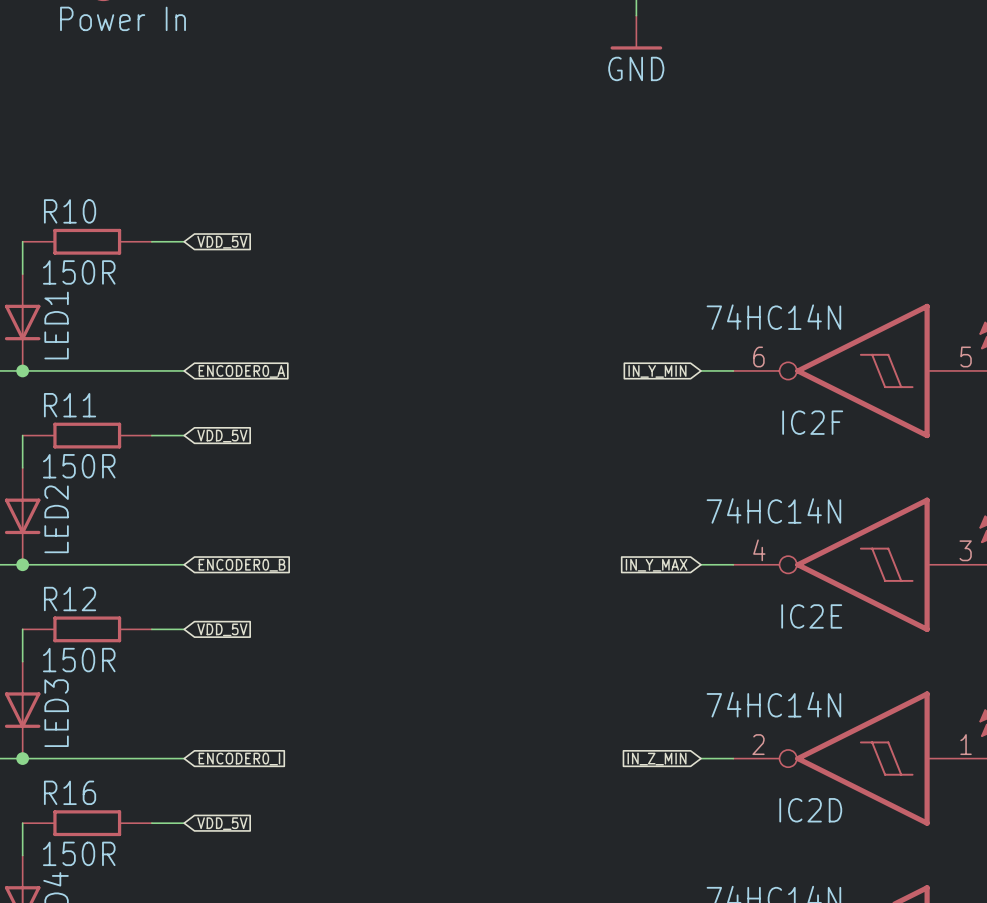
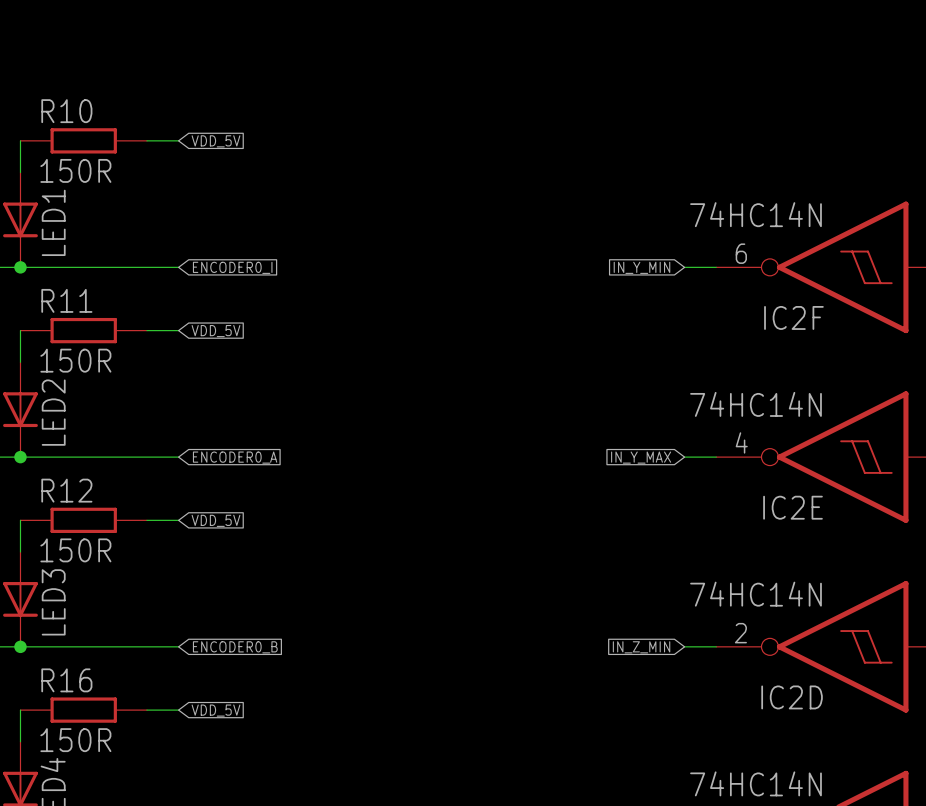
global label: ENCODER0_A (241, 371) -> ENCODER0_I (232, 267)
global label: ENCODER0_B (242, 565) -> ENCODER0_A (235, 457)
global label: ENCODER0_I (239, 759) -> ENCODER0_B (235, 647)

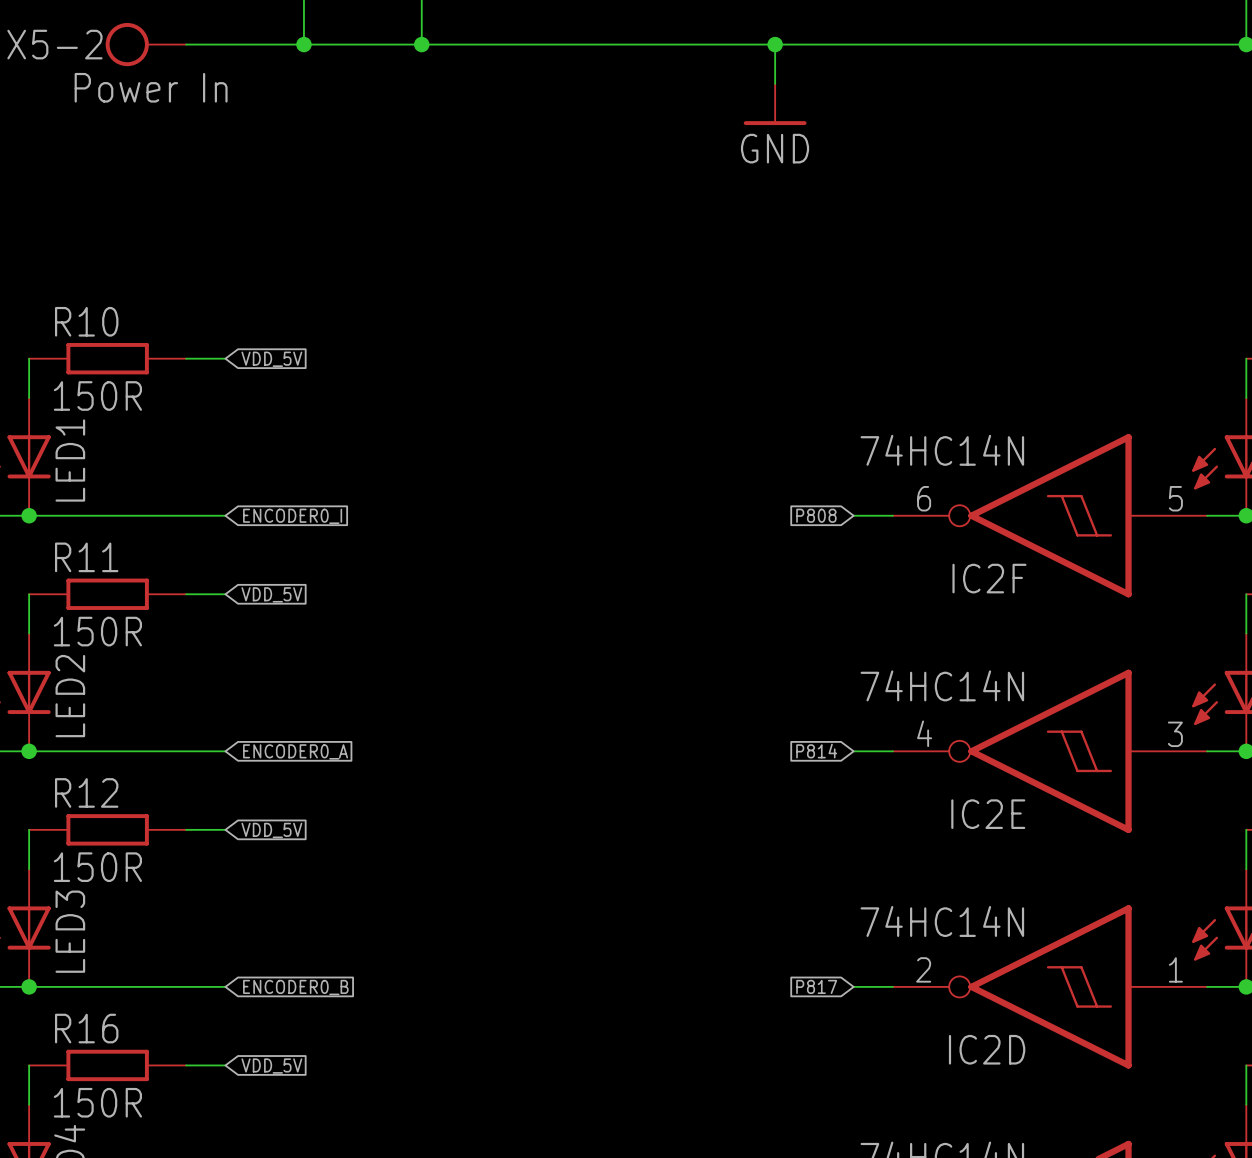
global label: IN_Y_MIN (641, 267) -> P808 (816, 515)
global label: IN_Y_MAX (641, 457) -> P814 (816, 751)
global label: IN_Z_MIN (641, 647) -> P817 (816, 986)

